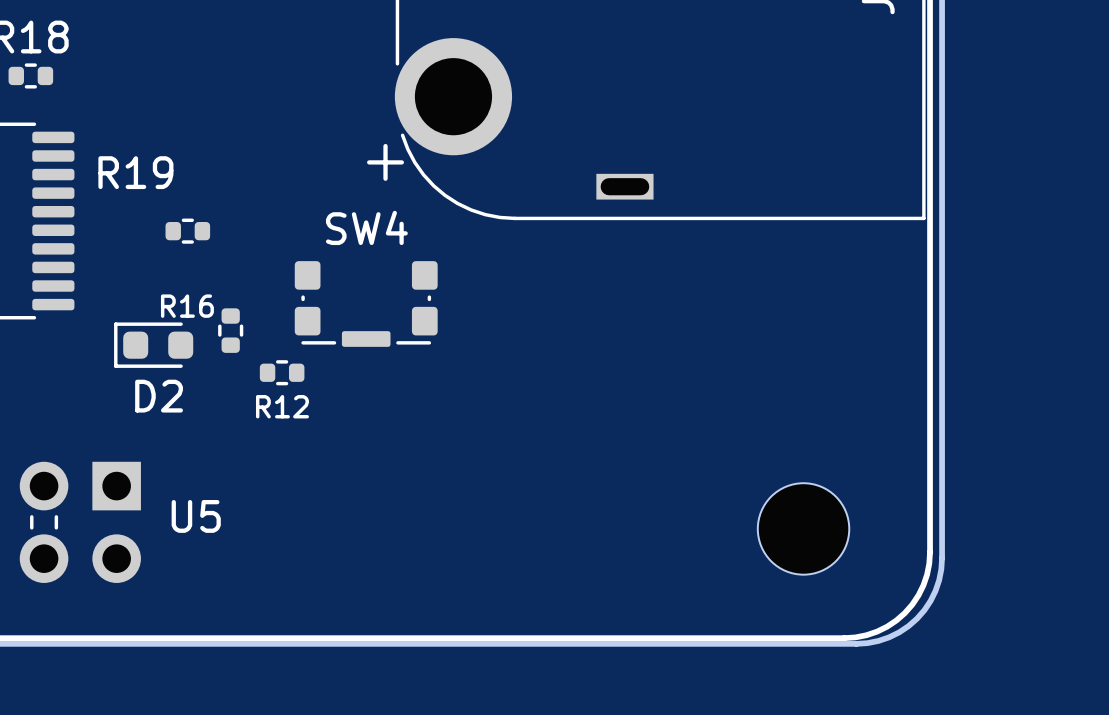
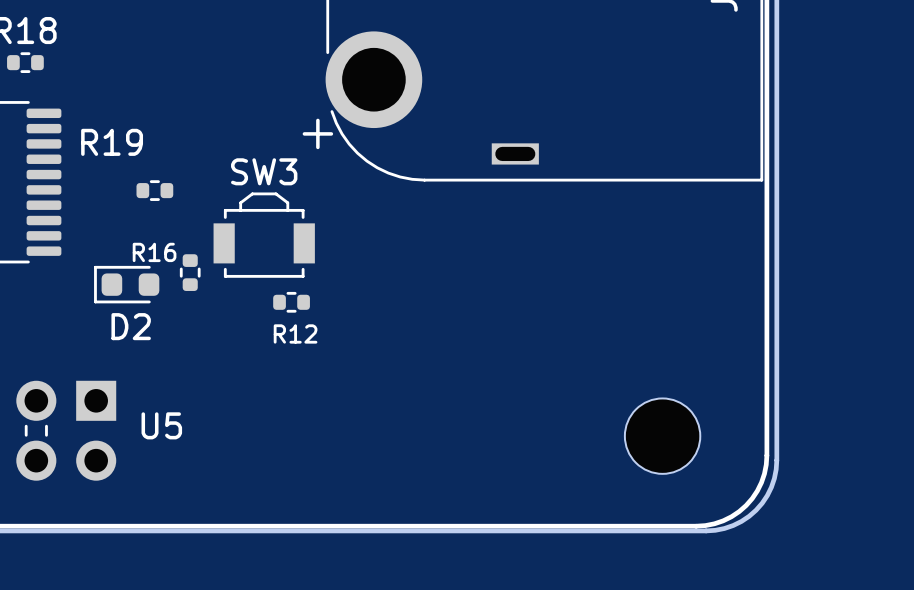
SW3: none -> (264, 235)
SW4: (366, 303) -> none
R12 position: (282, 372) -> (291, 302)
R12 name position: R12 (282, 406) -> R12 (295, 333)

